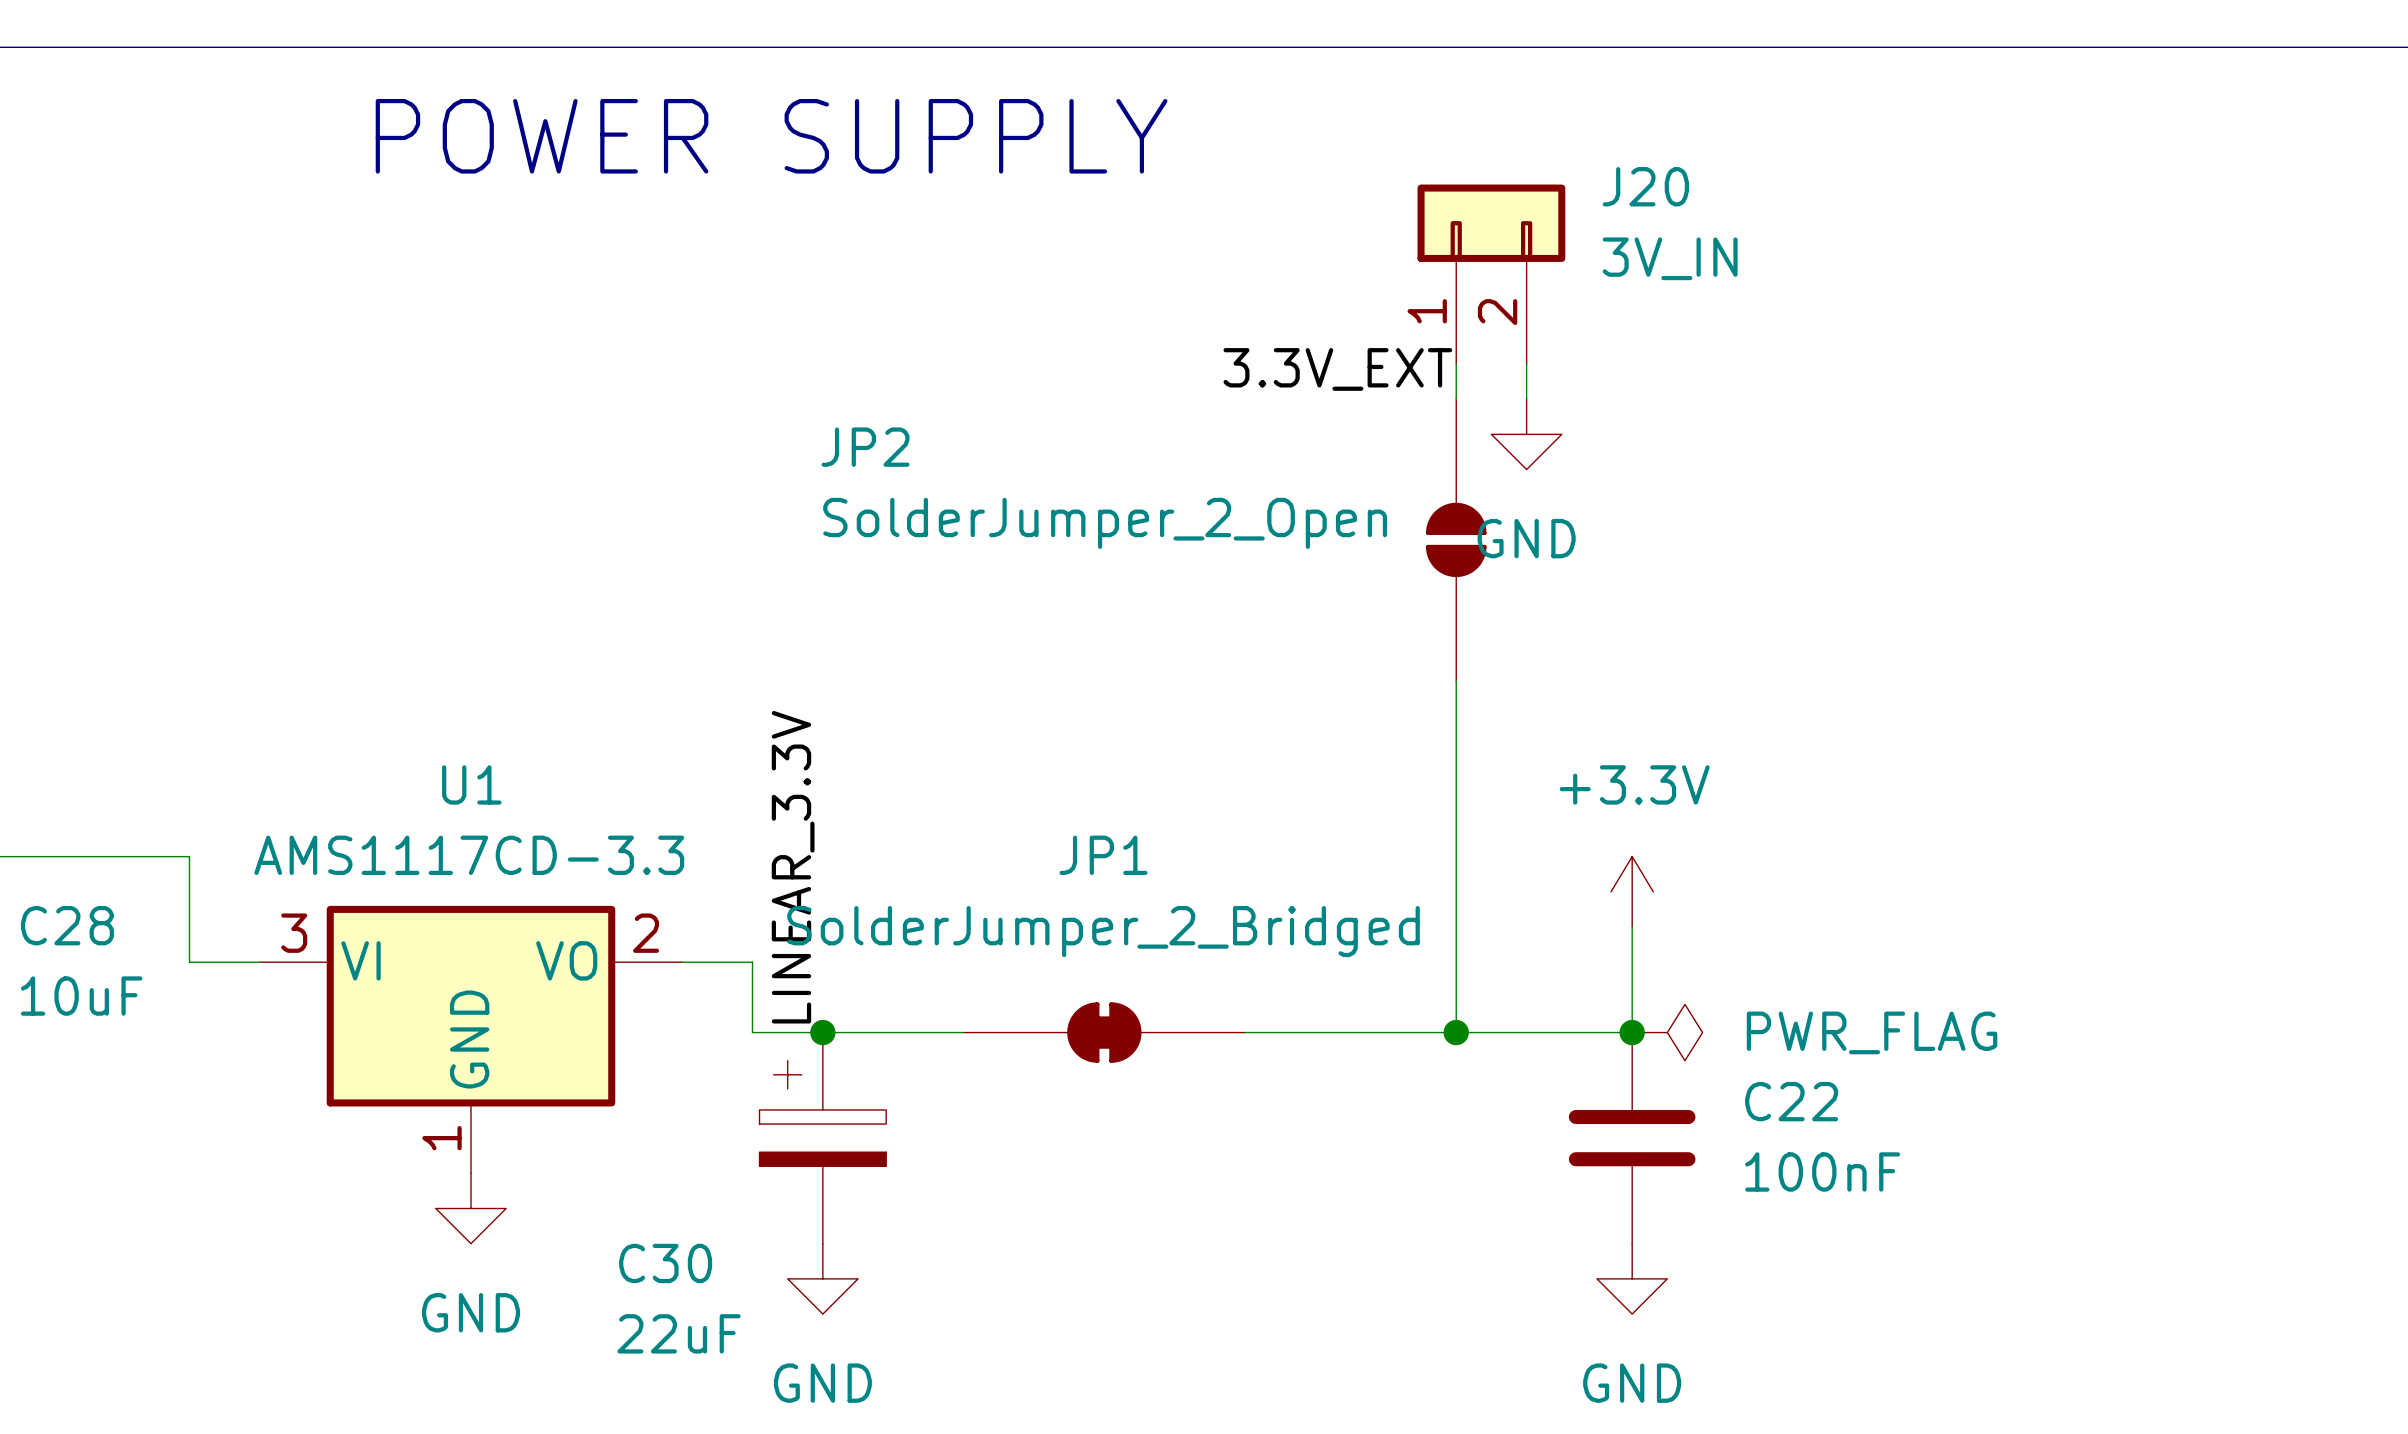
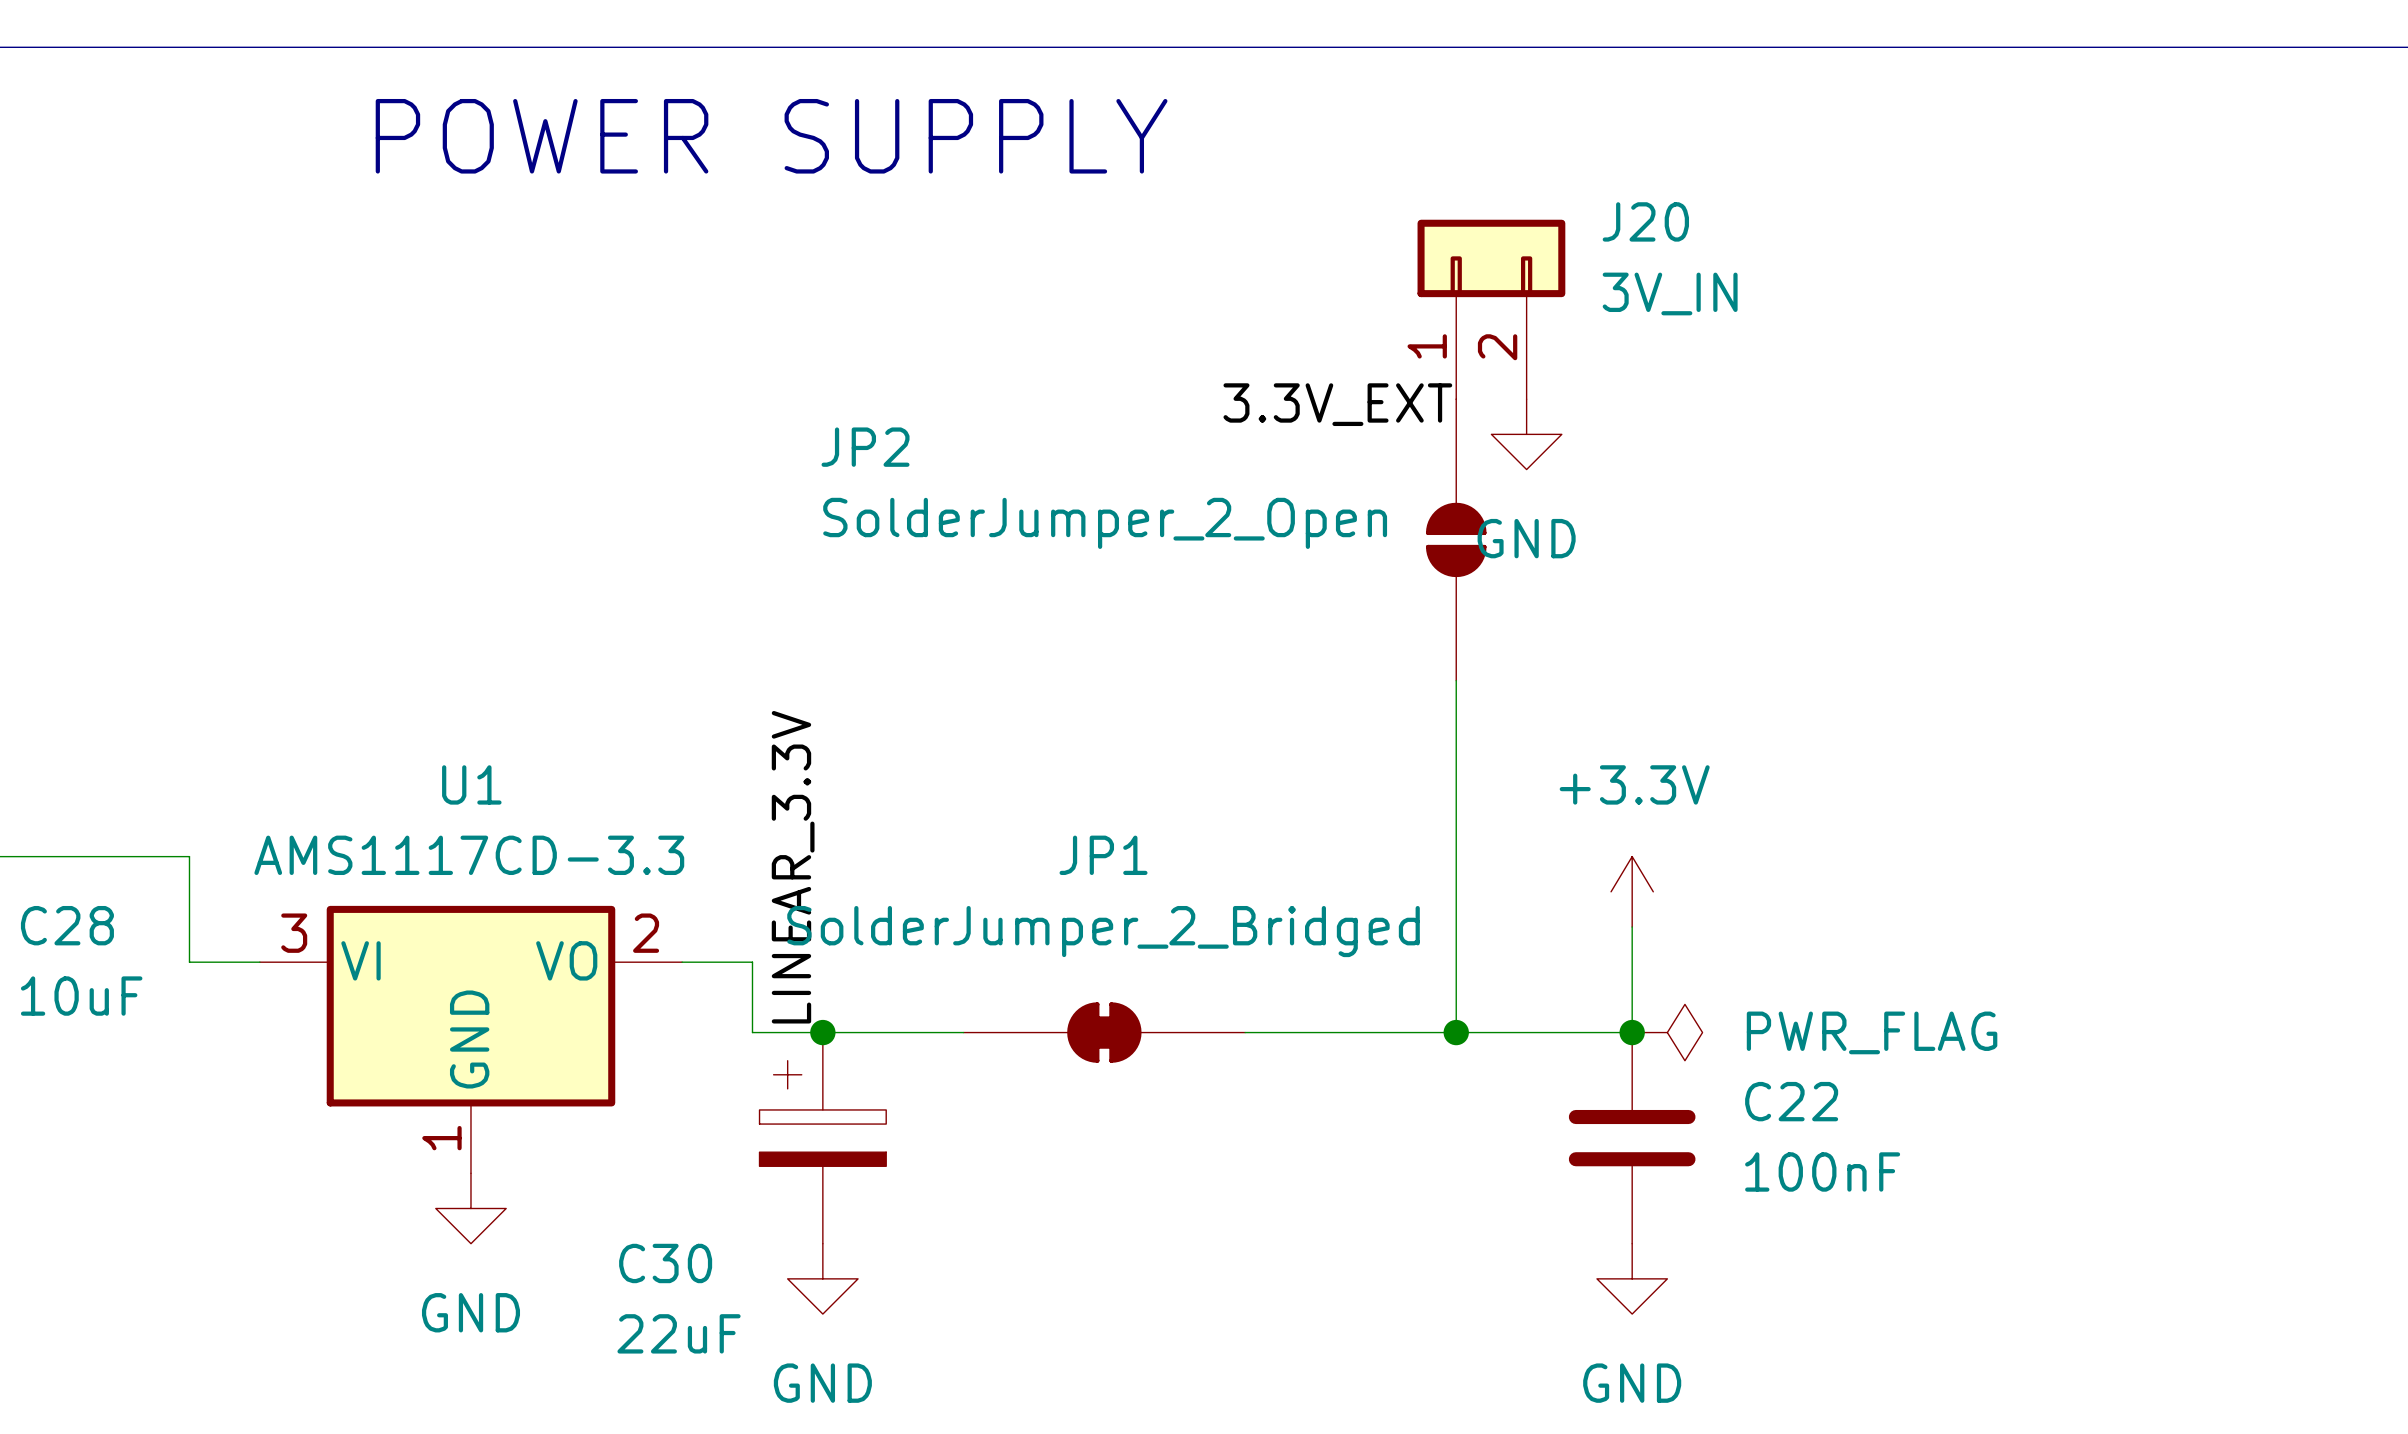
J20 position: (1491, 274) -> (1491, 309)
label position: 3.3V_EXT (1337, 369) -> 3.3V_EXT (1337, 404)

